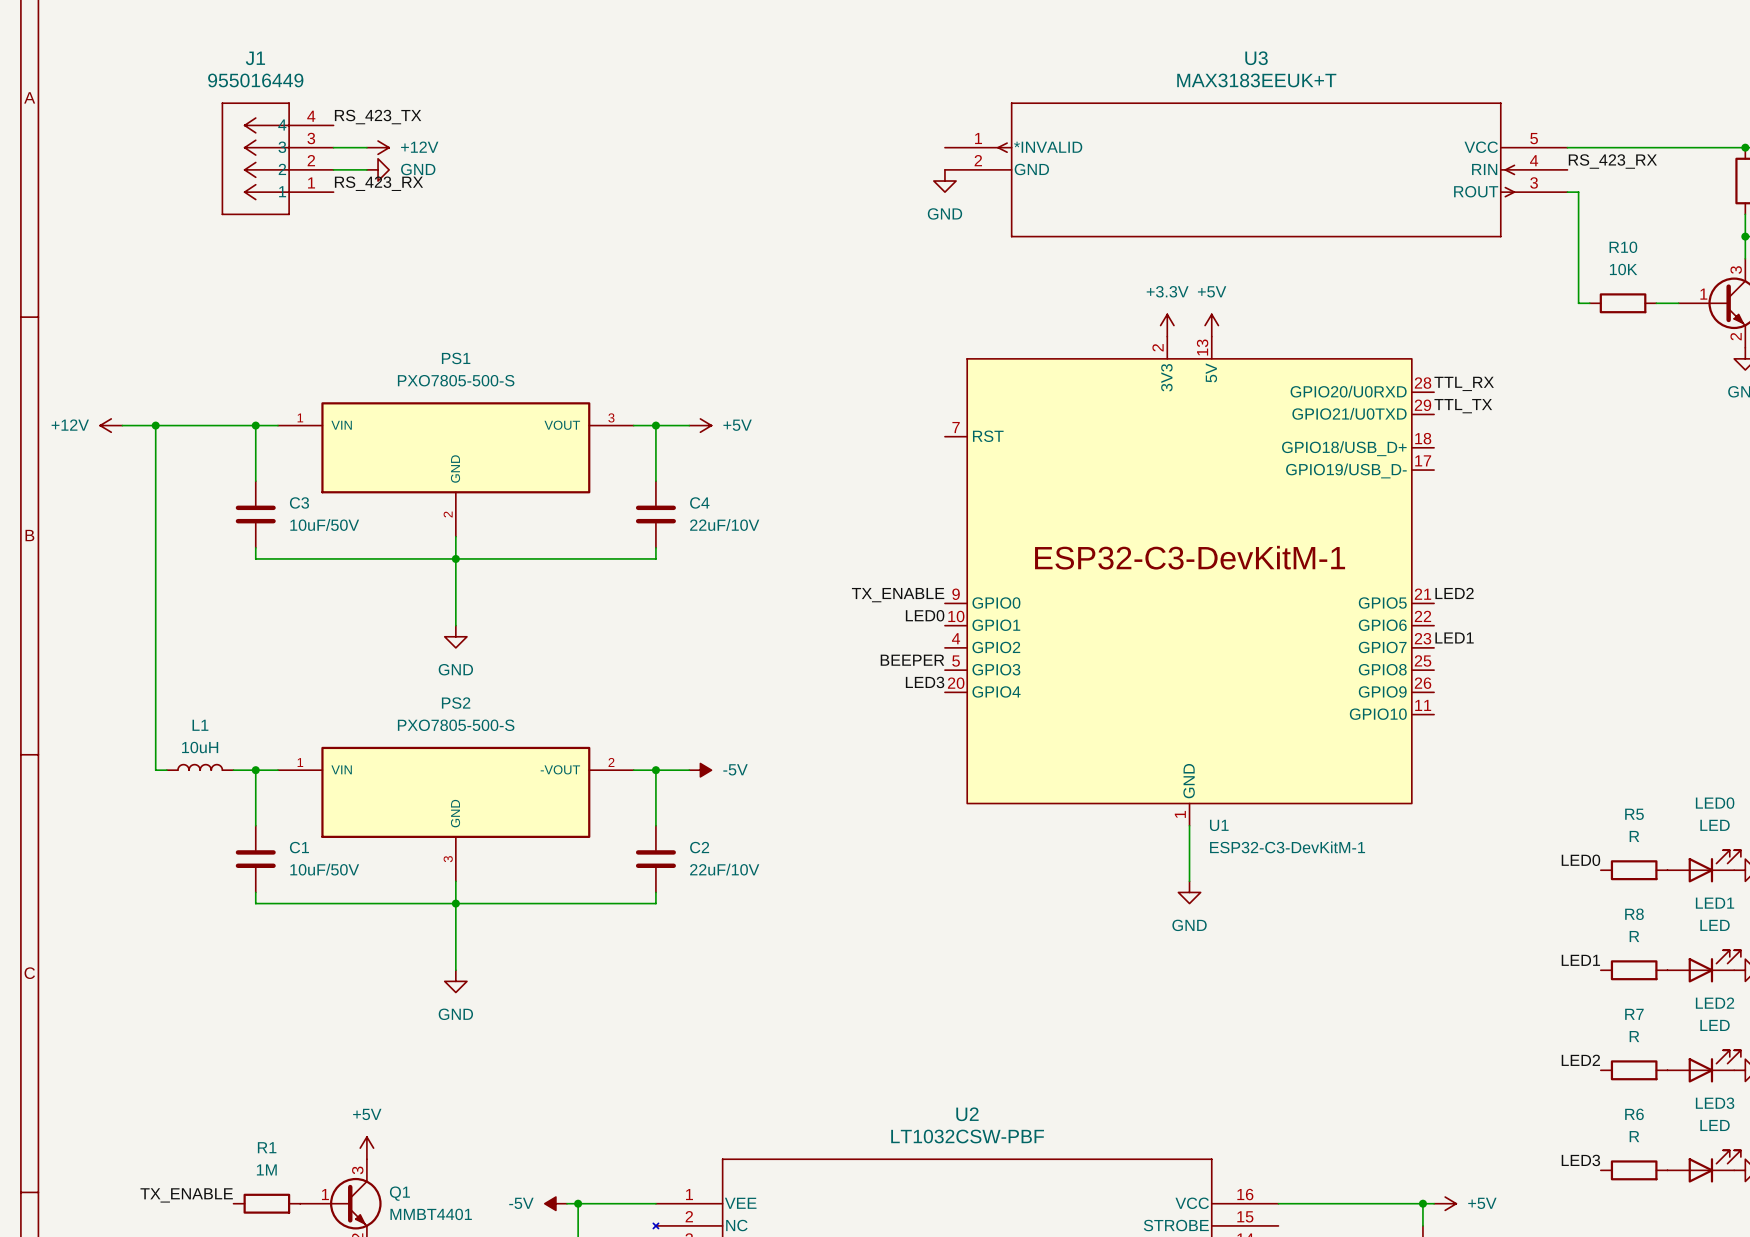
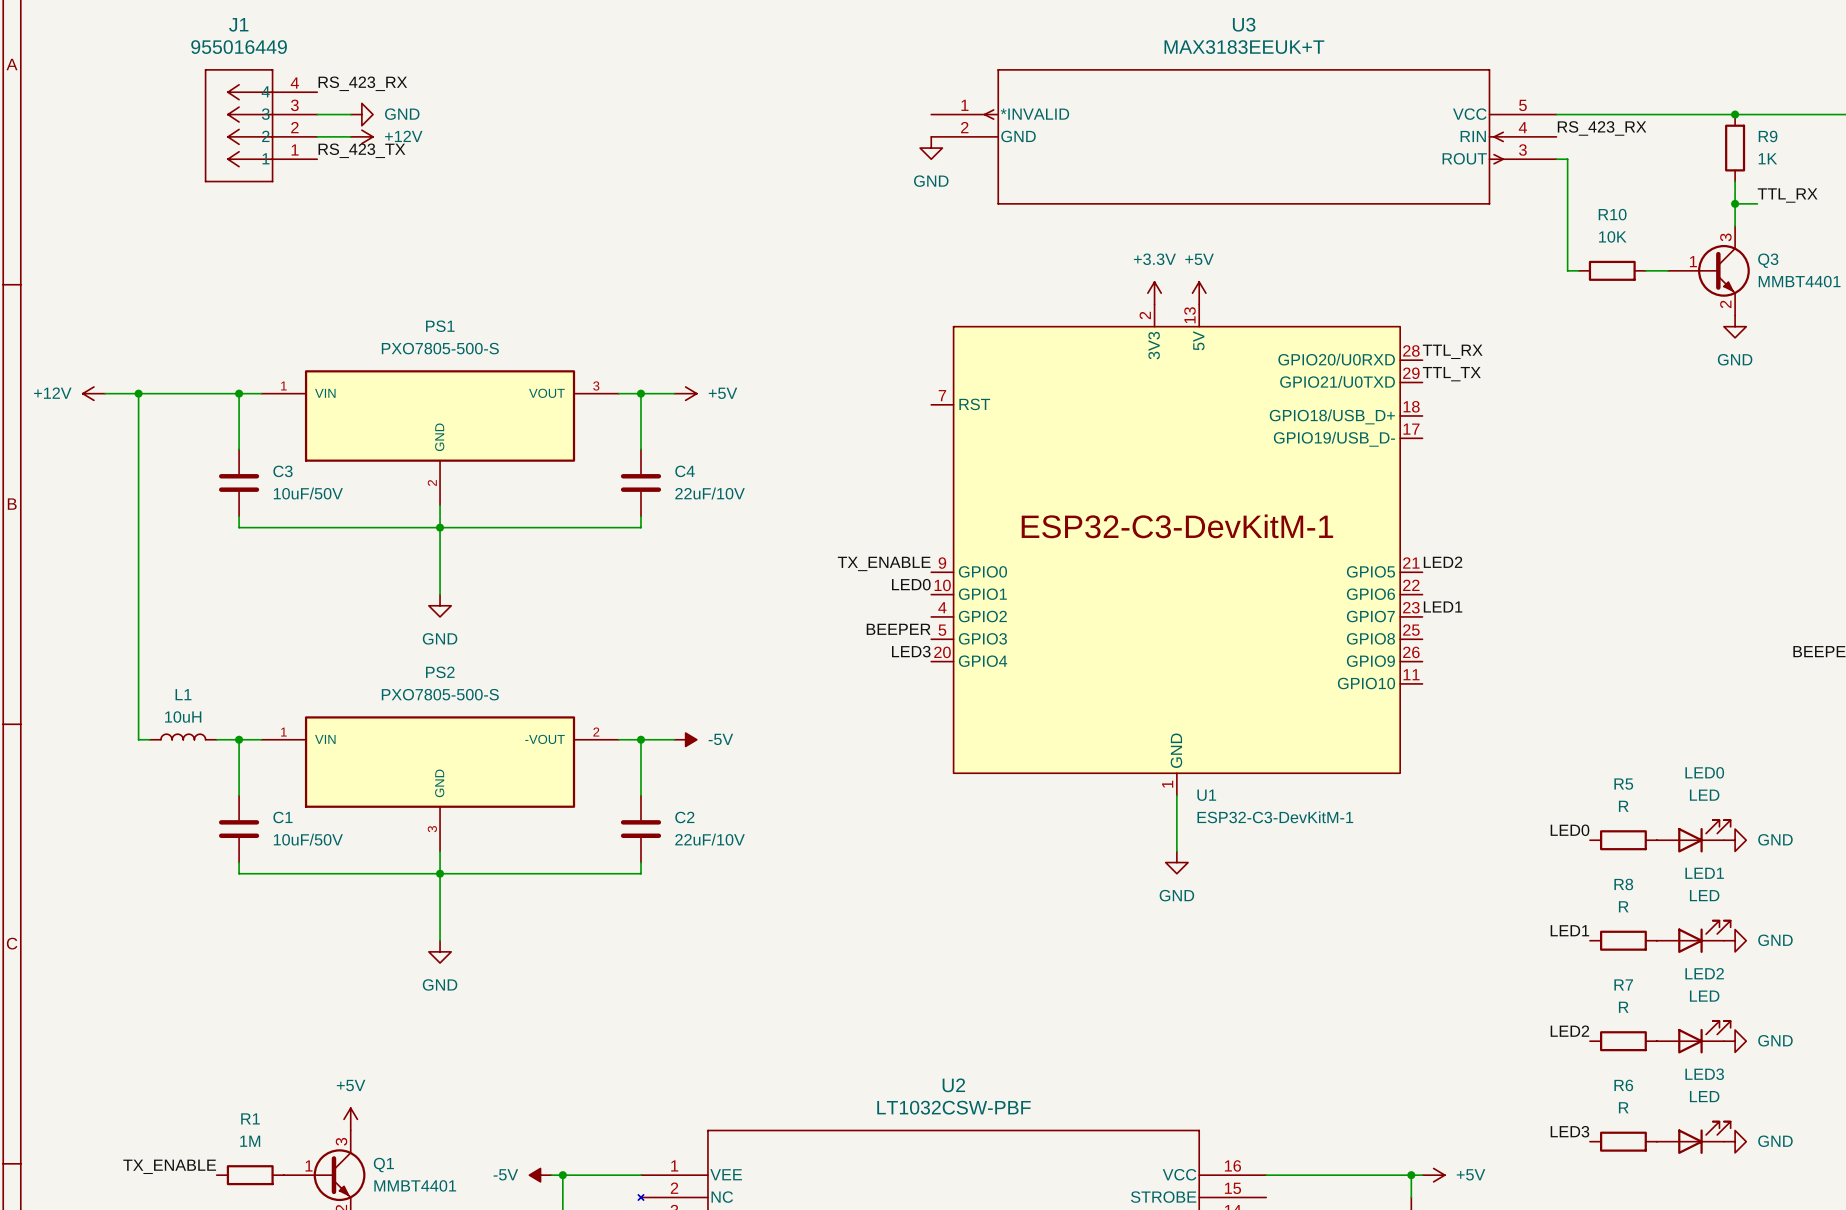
label: RS_423_TX (378, 117) -> RS_423_RX (362, 83)
power symbol: +12V (378, 147) -> GND (361, 114)
power symbol: GND (378, 169) -> +12V (361, 136)
label: RS_423_RX (378, 183) -> RS_423_TX (361, 150)

